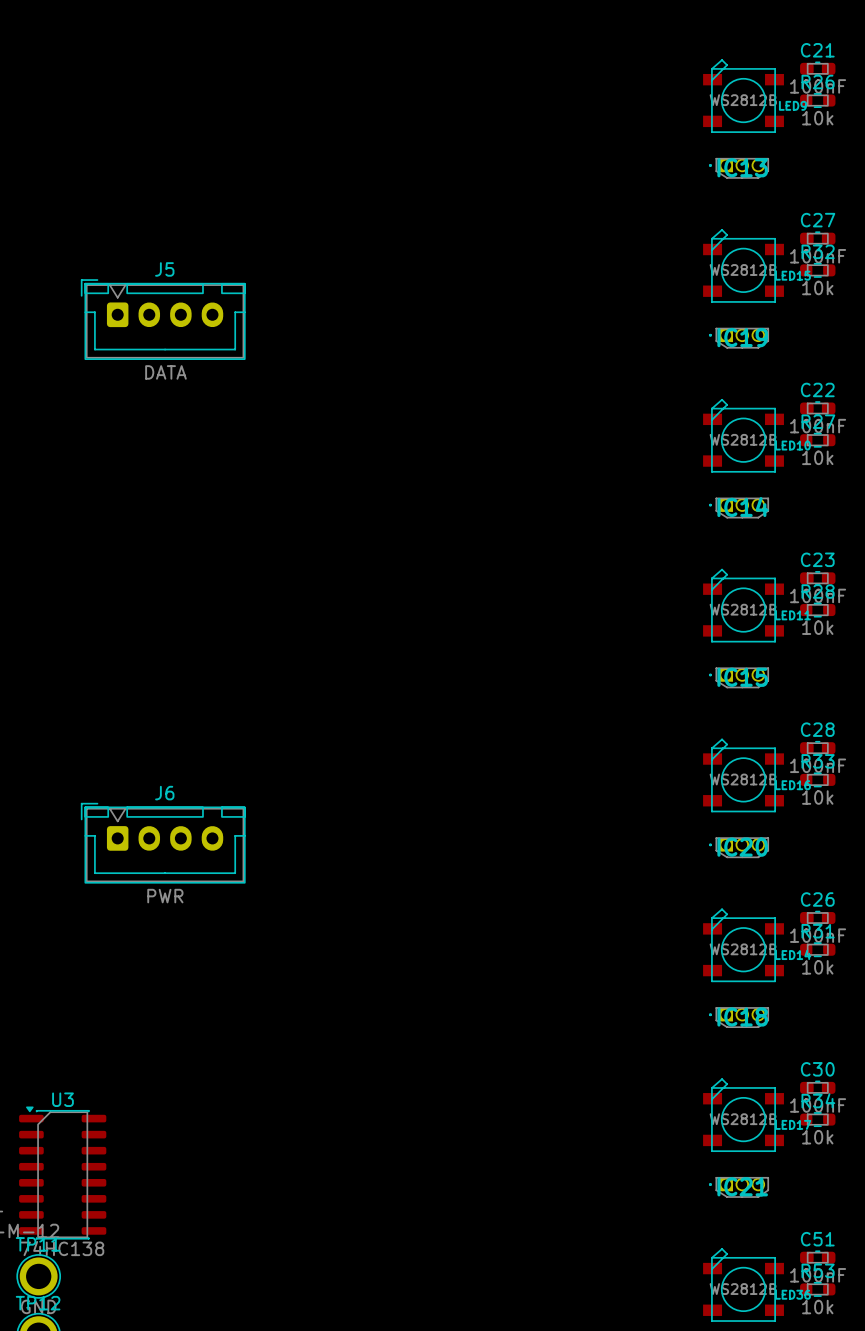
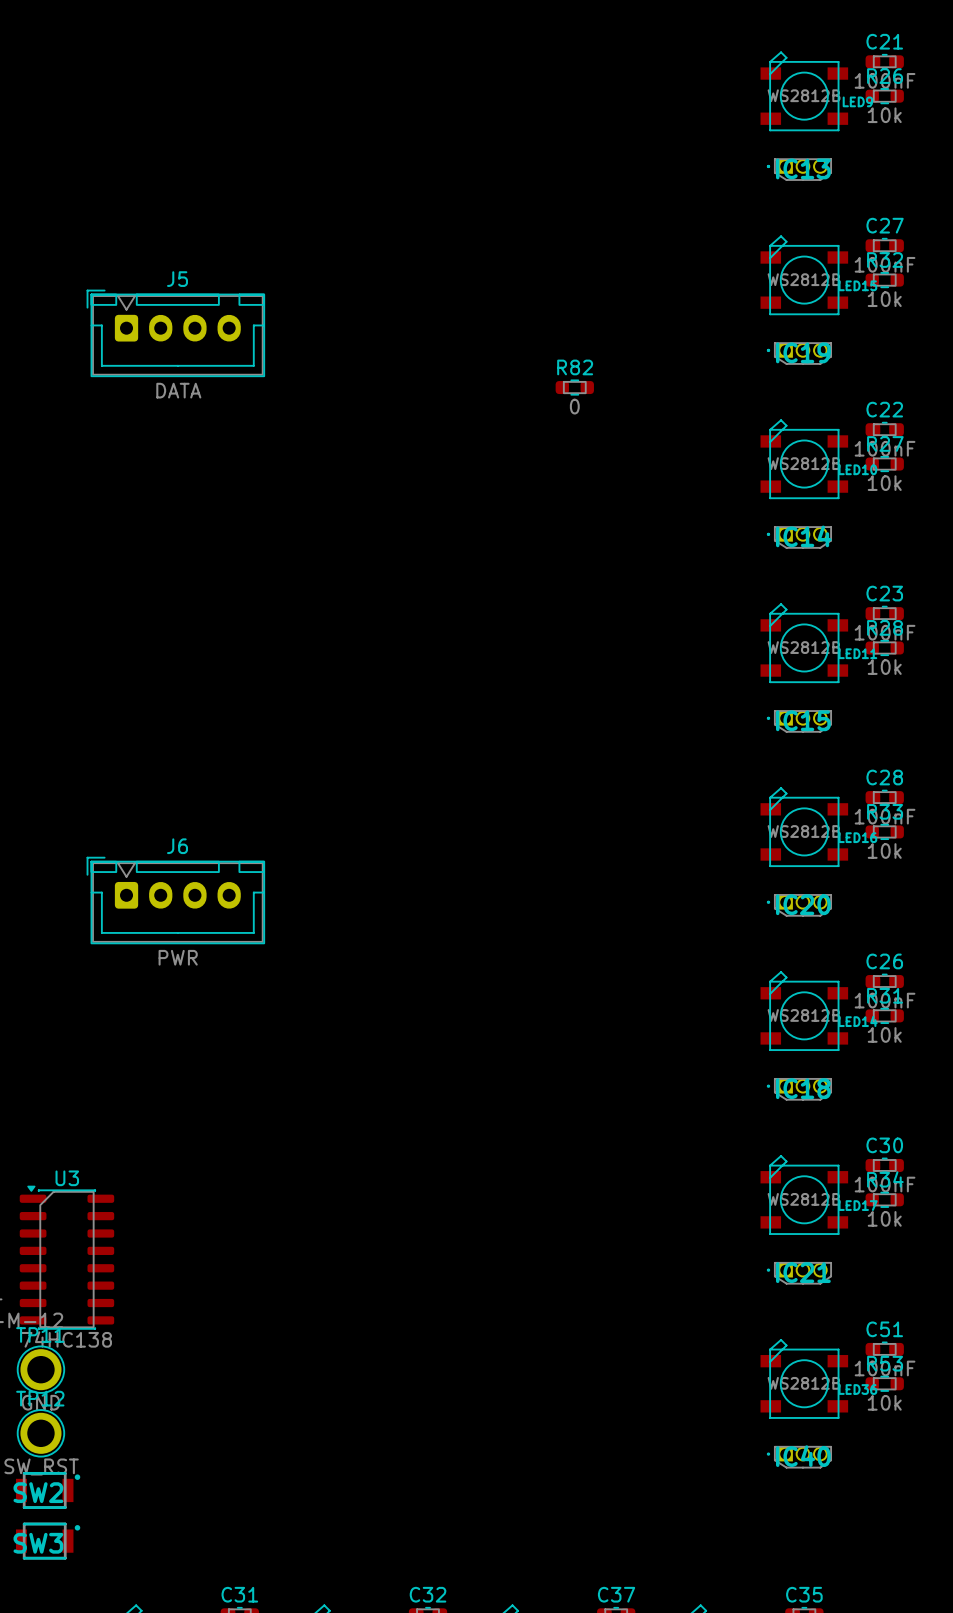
R82: none -> 0 (574, 387)

